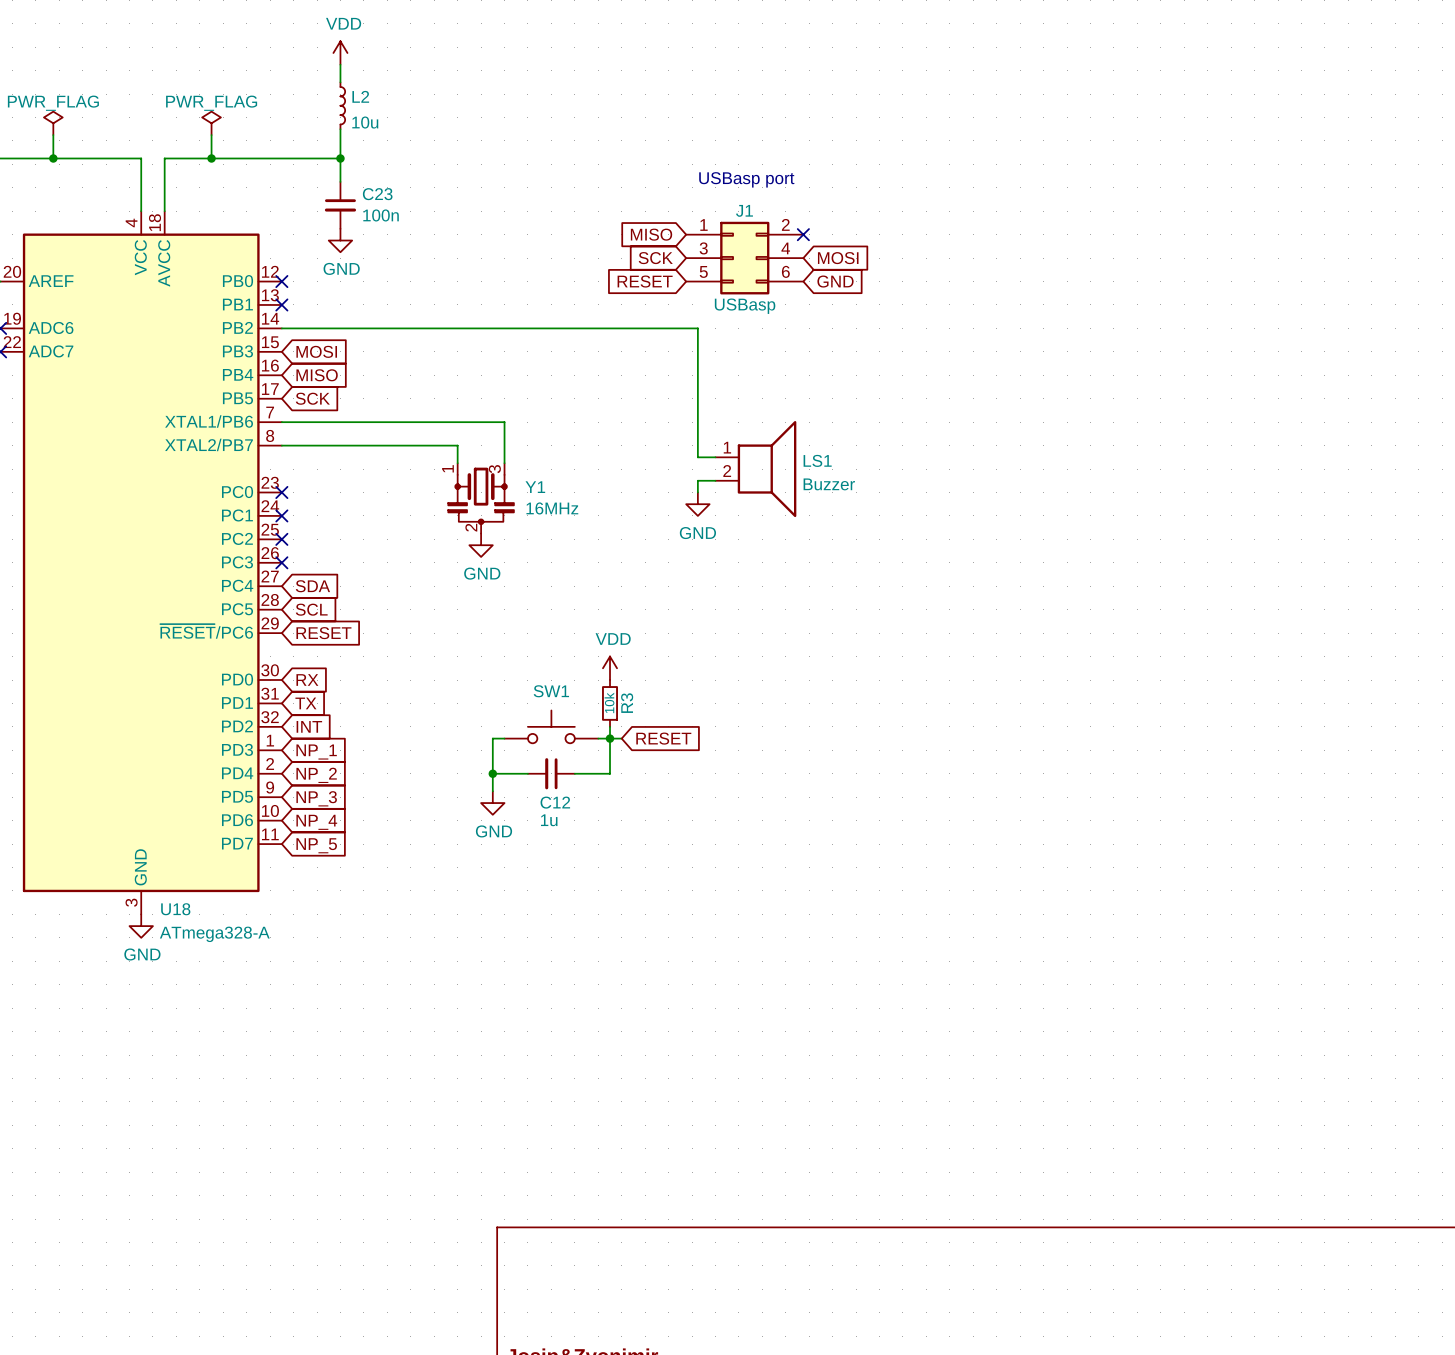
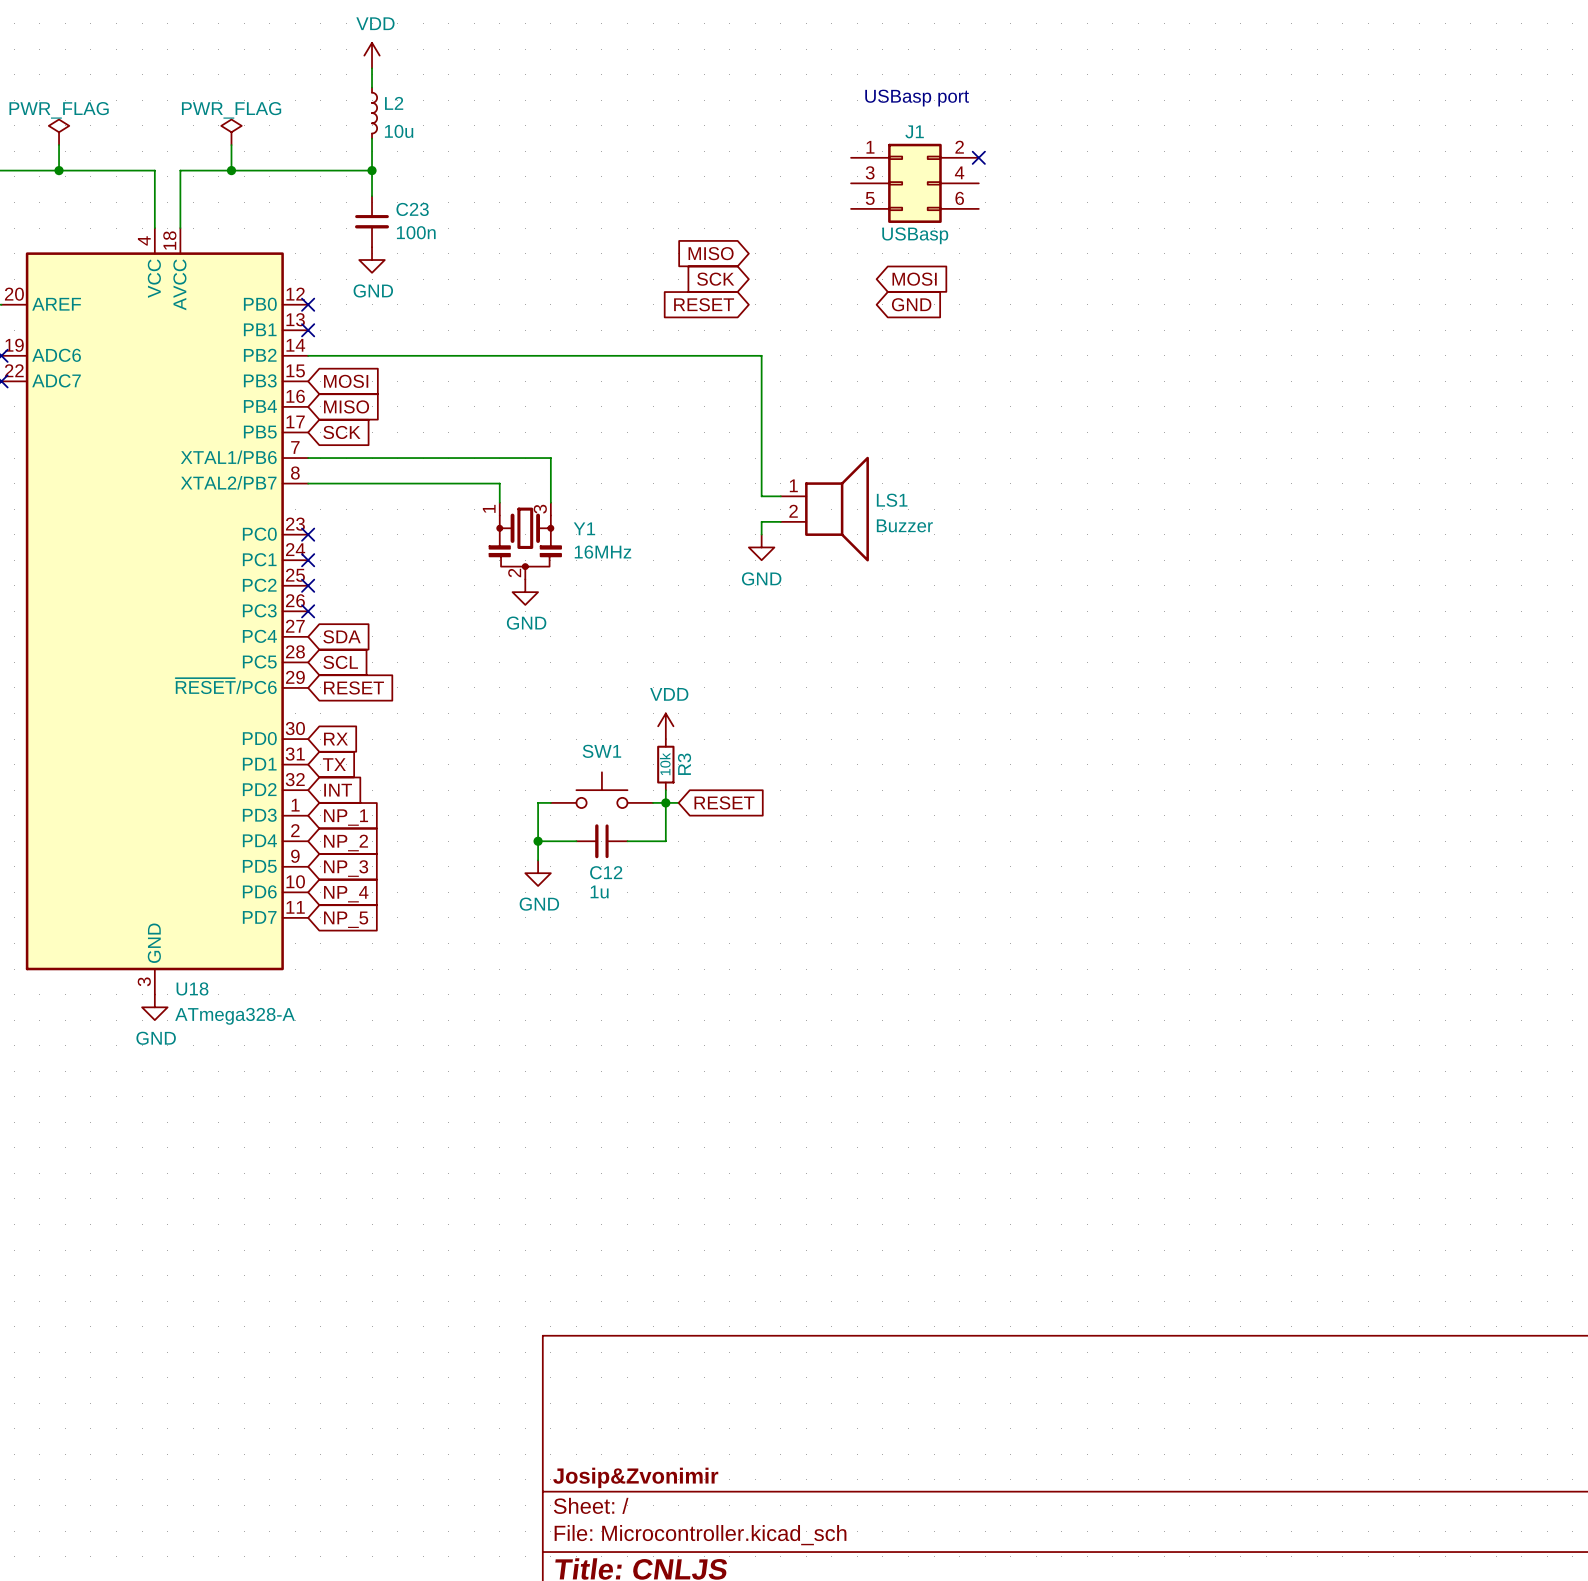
no-connect mark: none -> (978, 157)
text position: USBasp port (746, 179) -> USBasp port (917, 98)
no-connect mark: (803, 234) -> none
J1 position: (744, 258) -> (914, 183)

